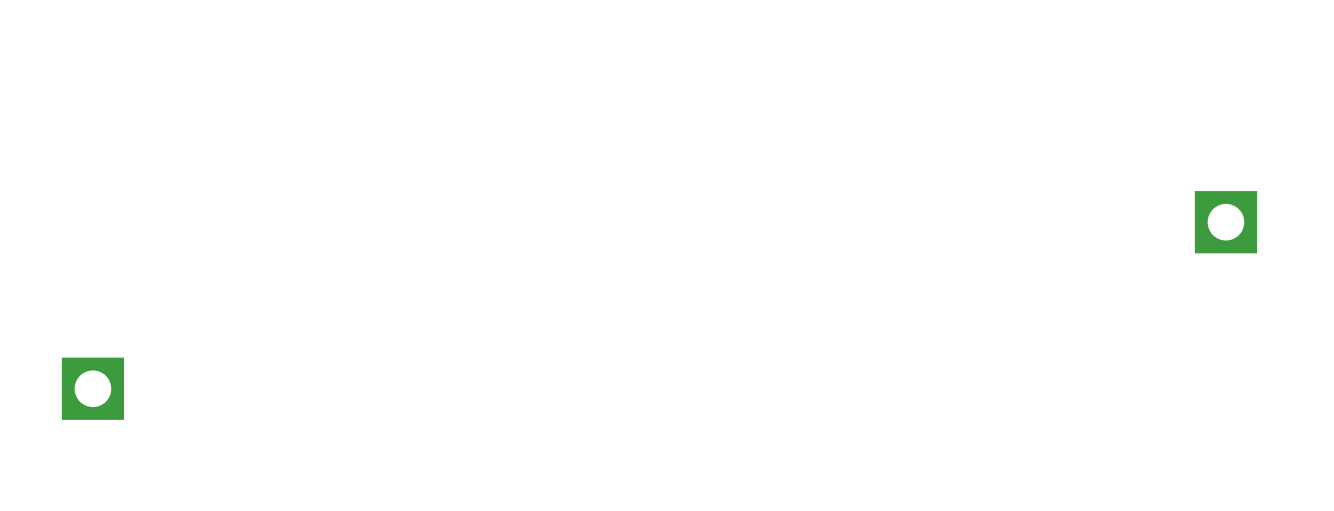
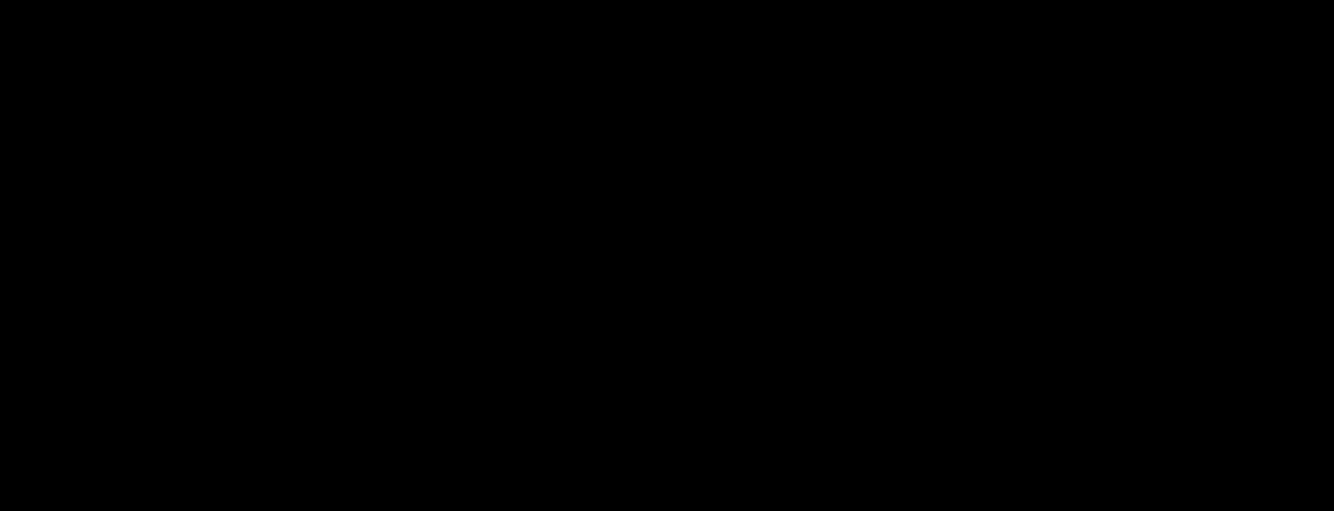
part: (1225, 222) -> none
part: (92, 388) -> none

